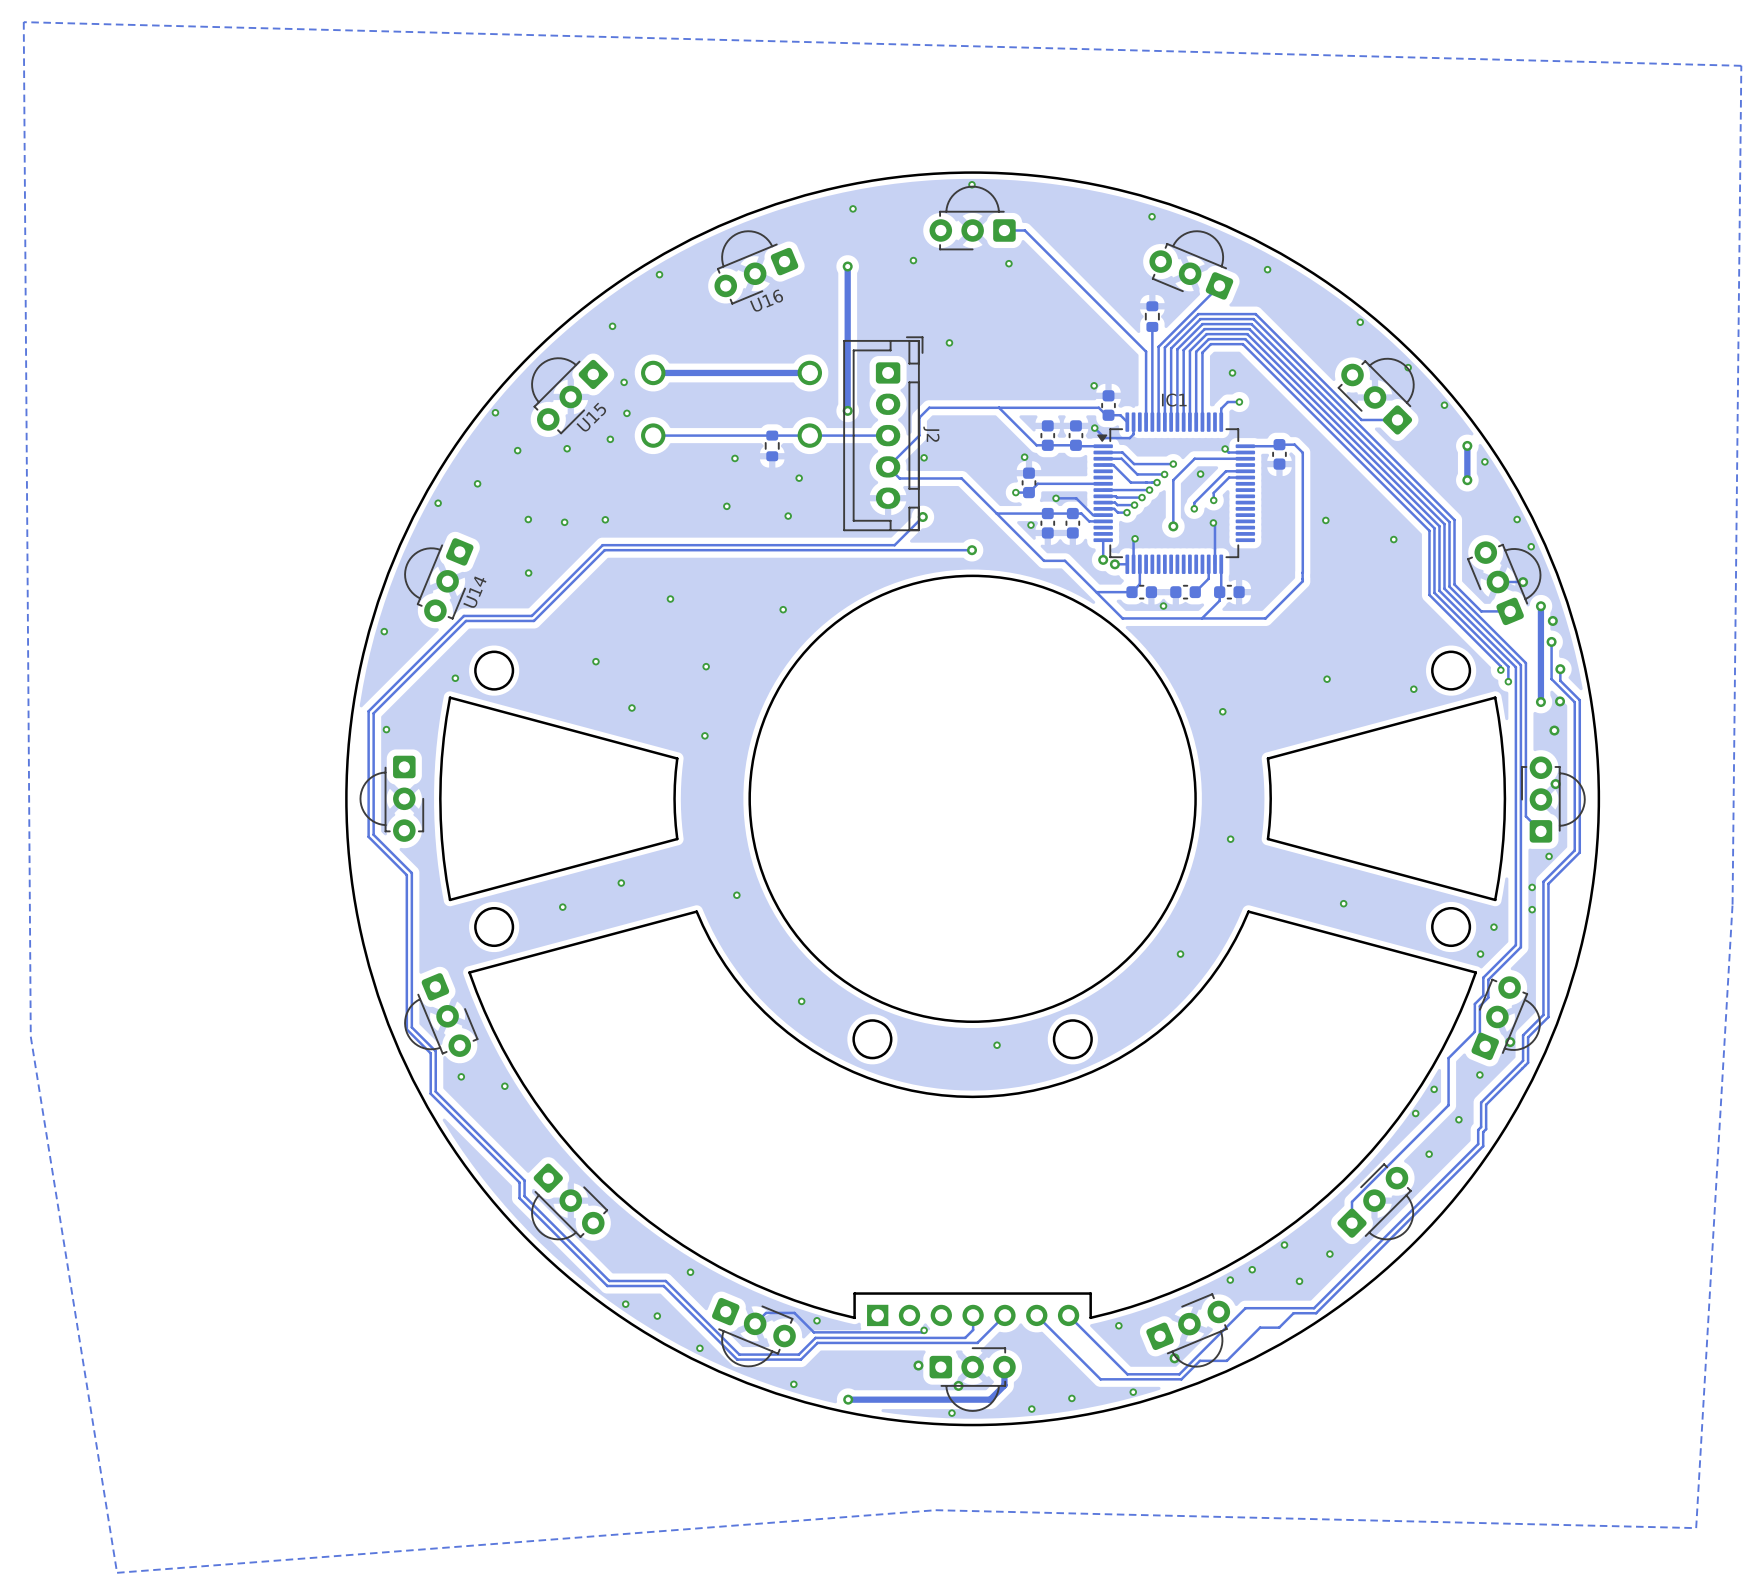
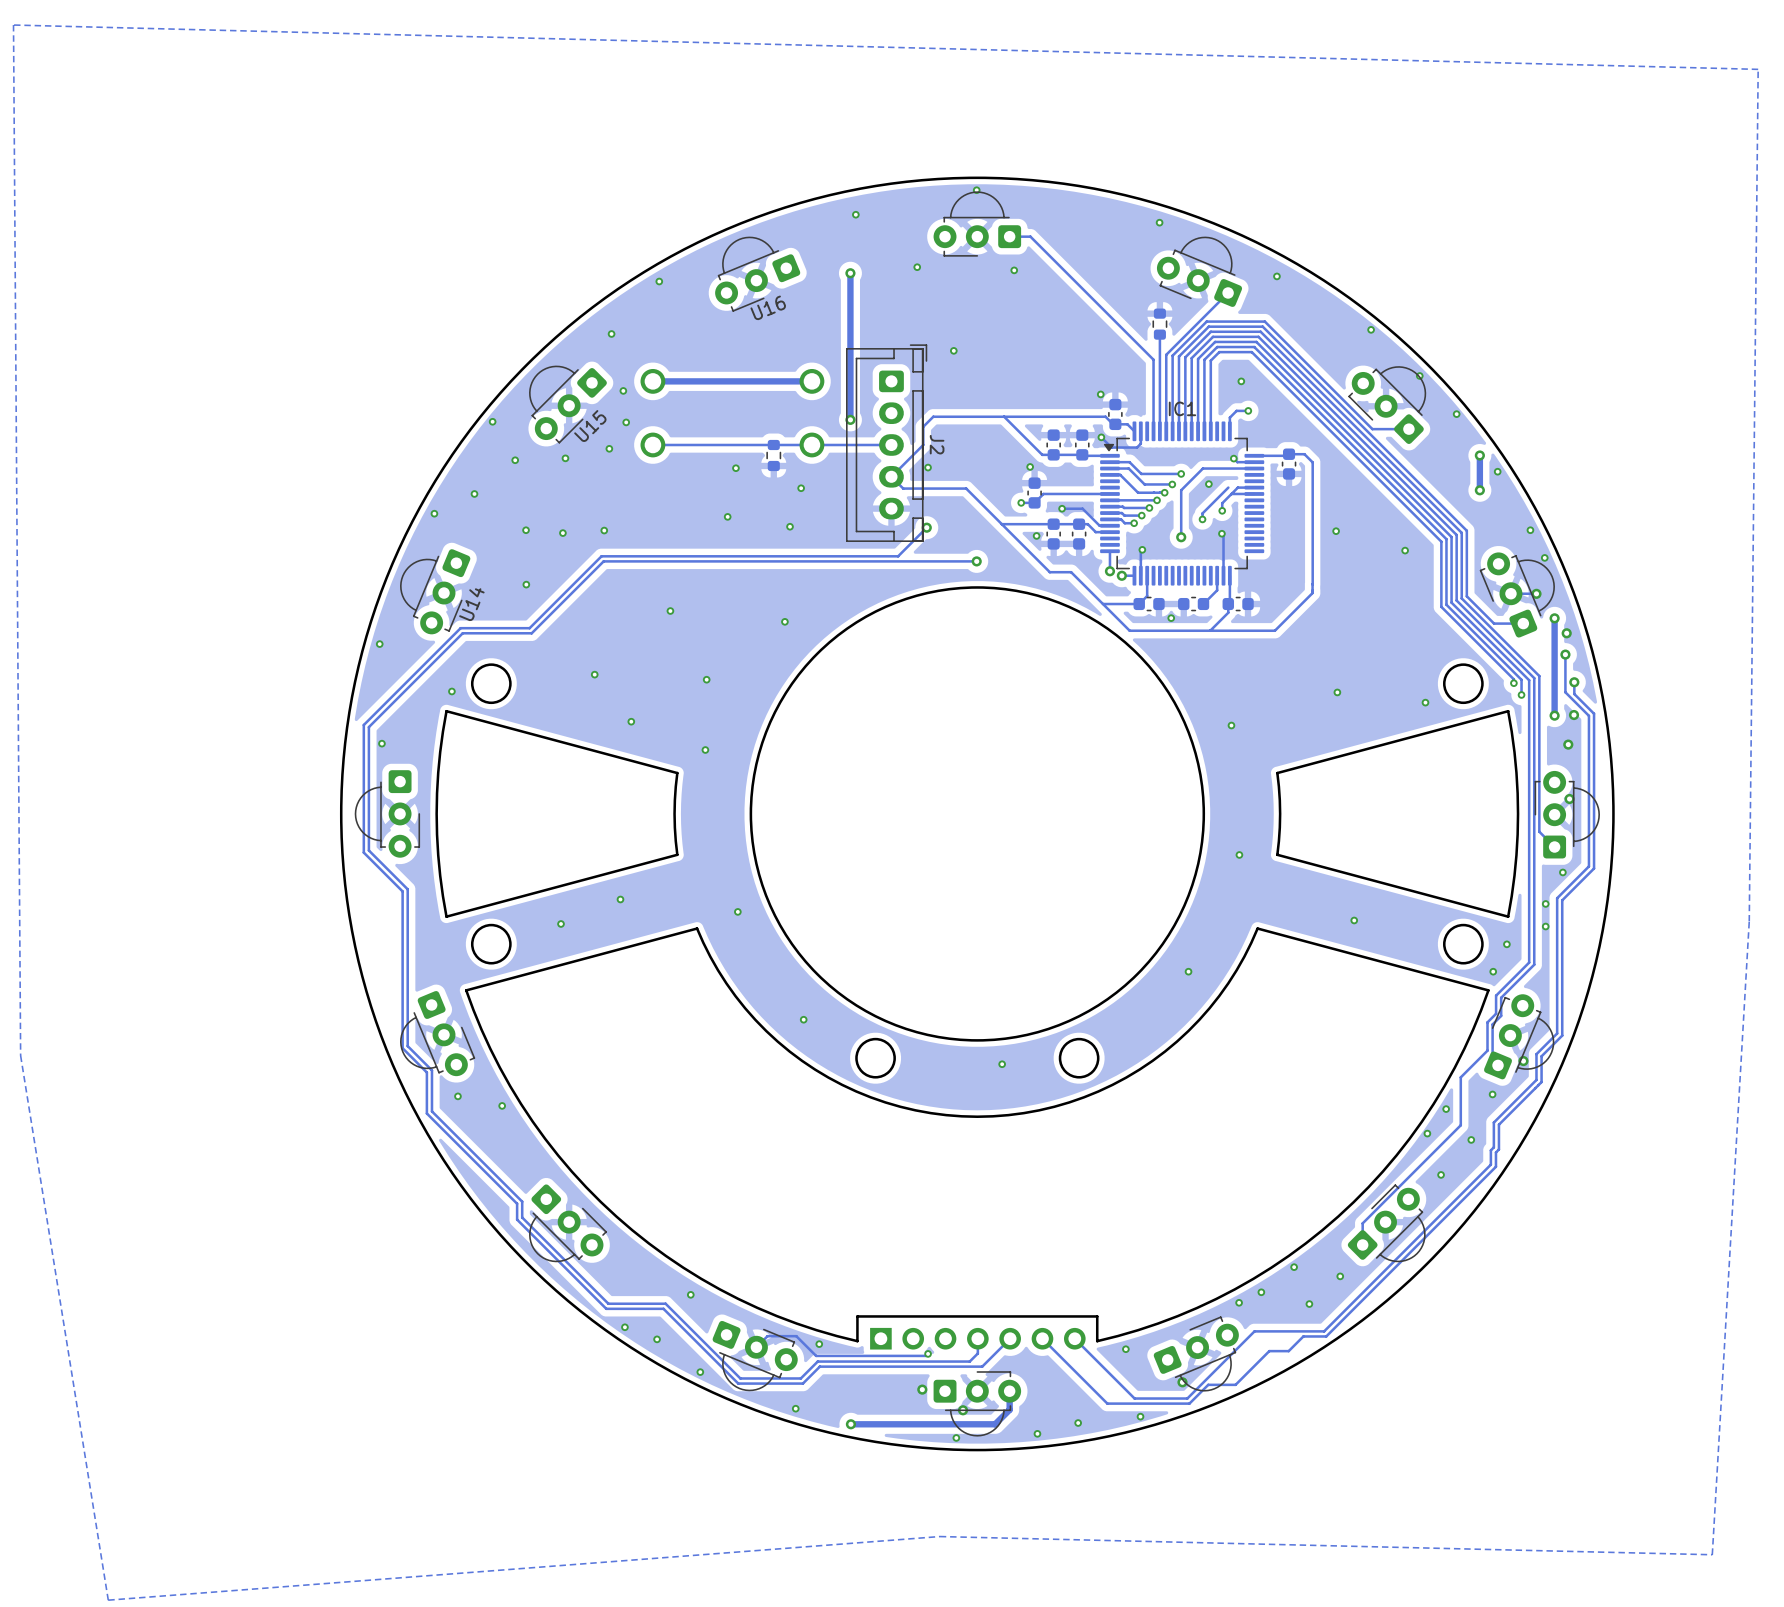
track: (1245, 471) (1226, 471) (1219, 477) -> none
track: none -> (1254, 493) (1231, 493)

